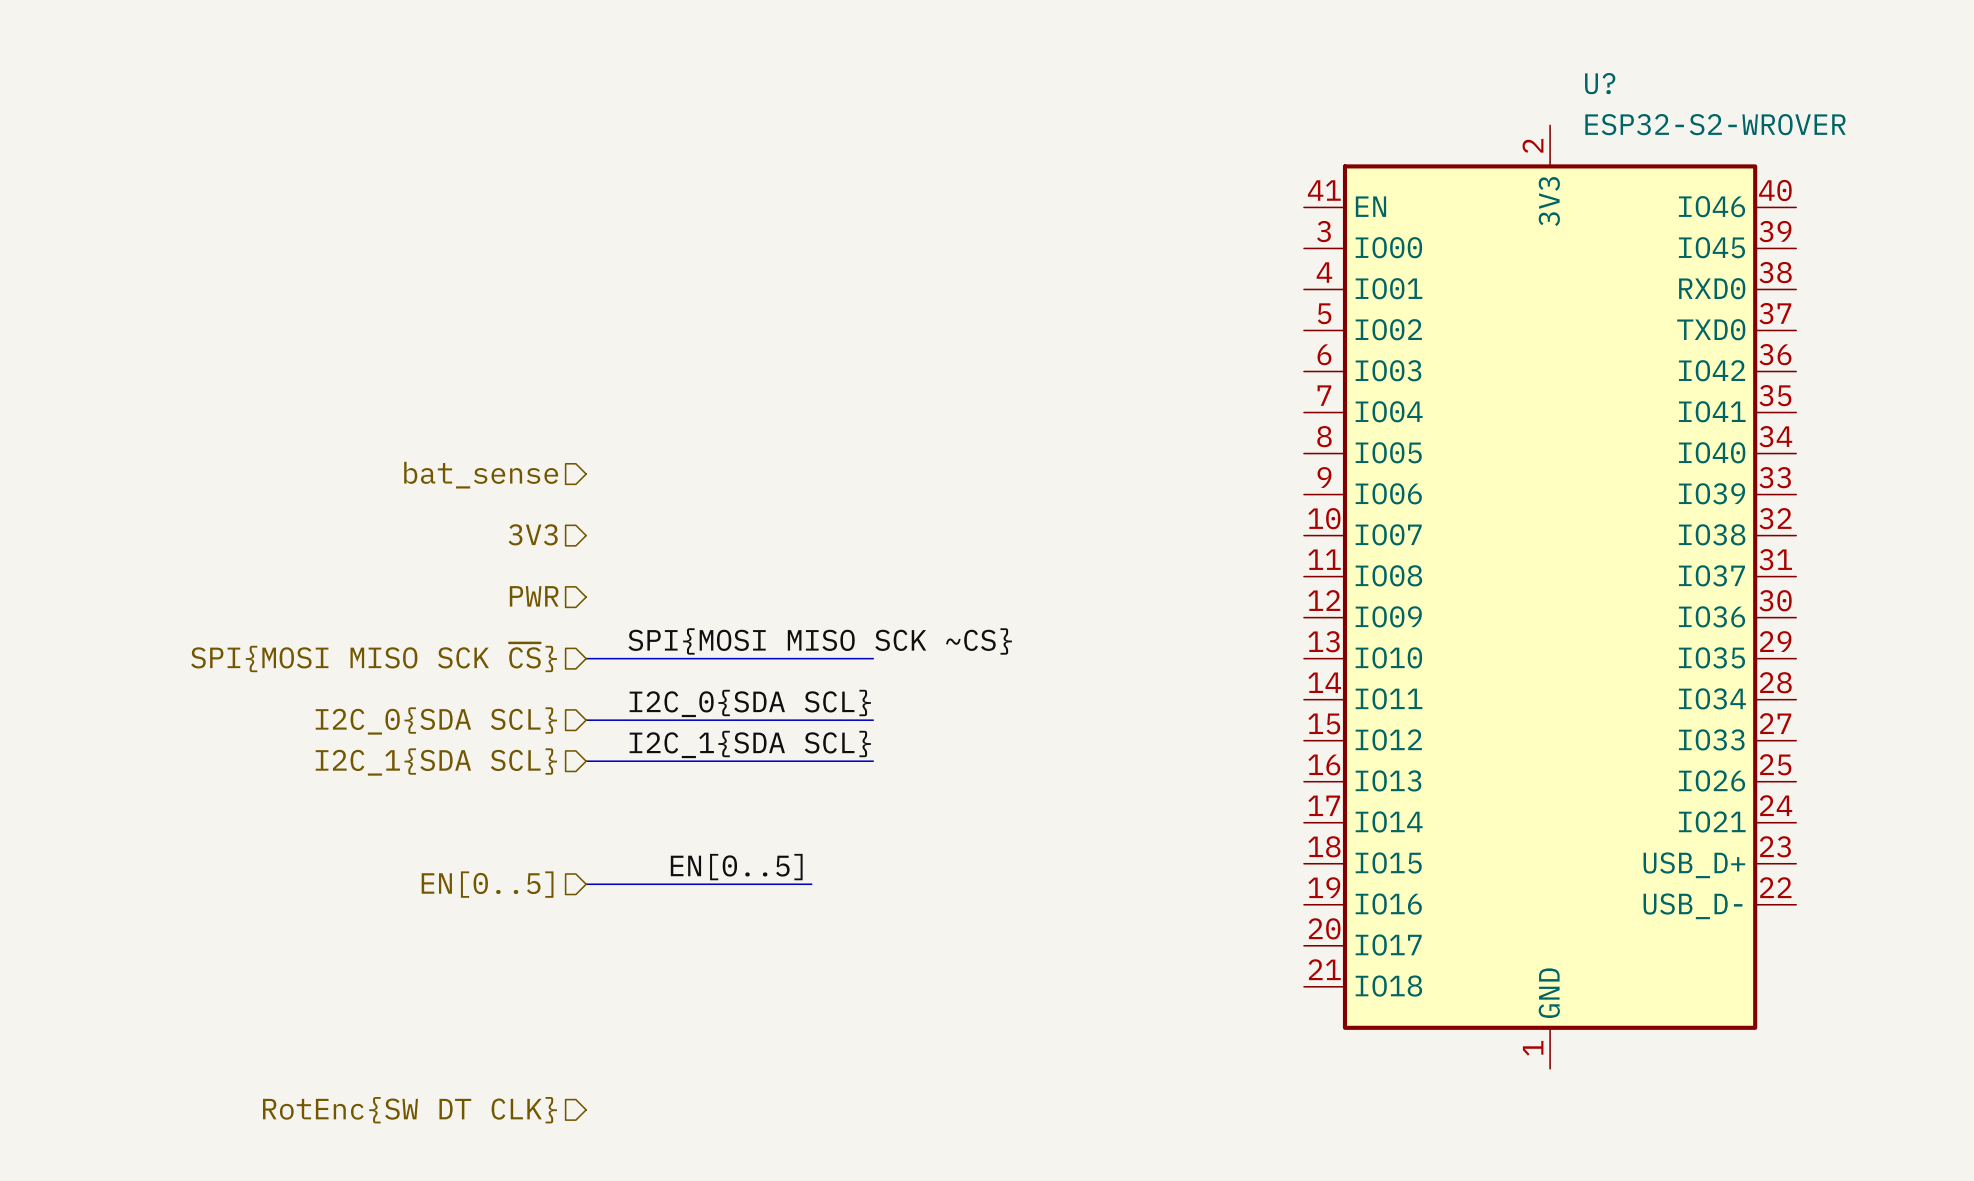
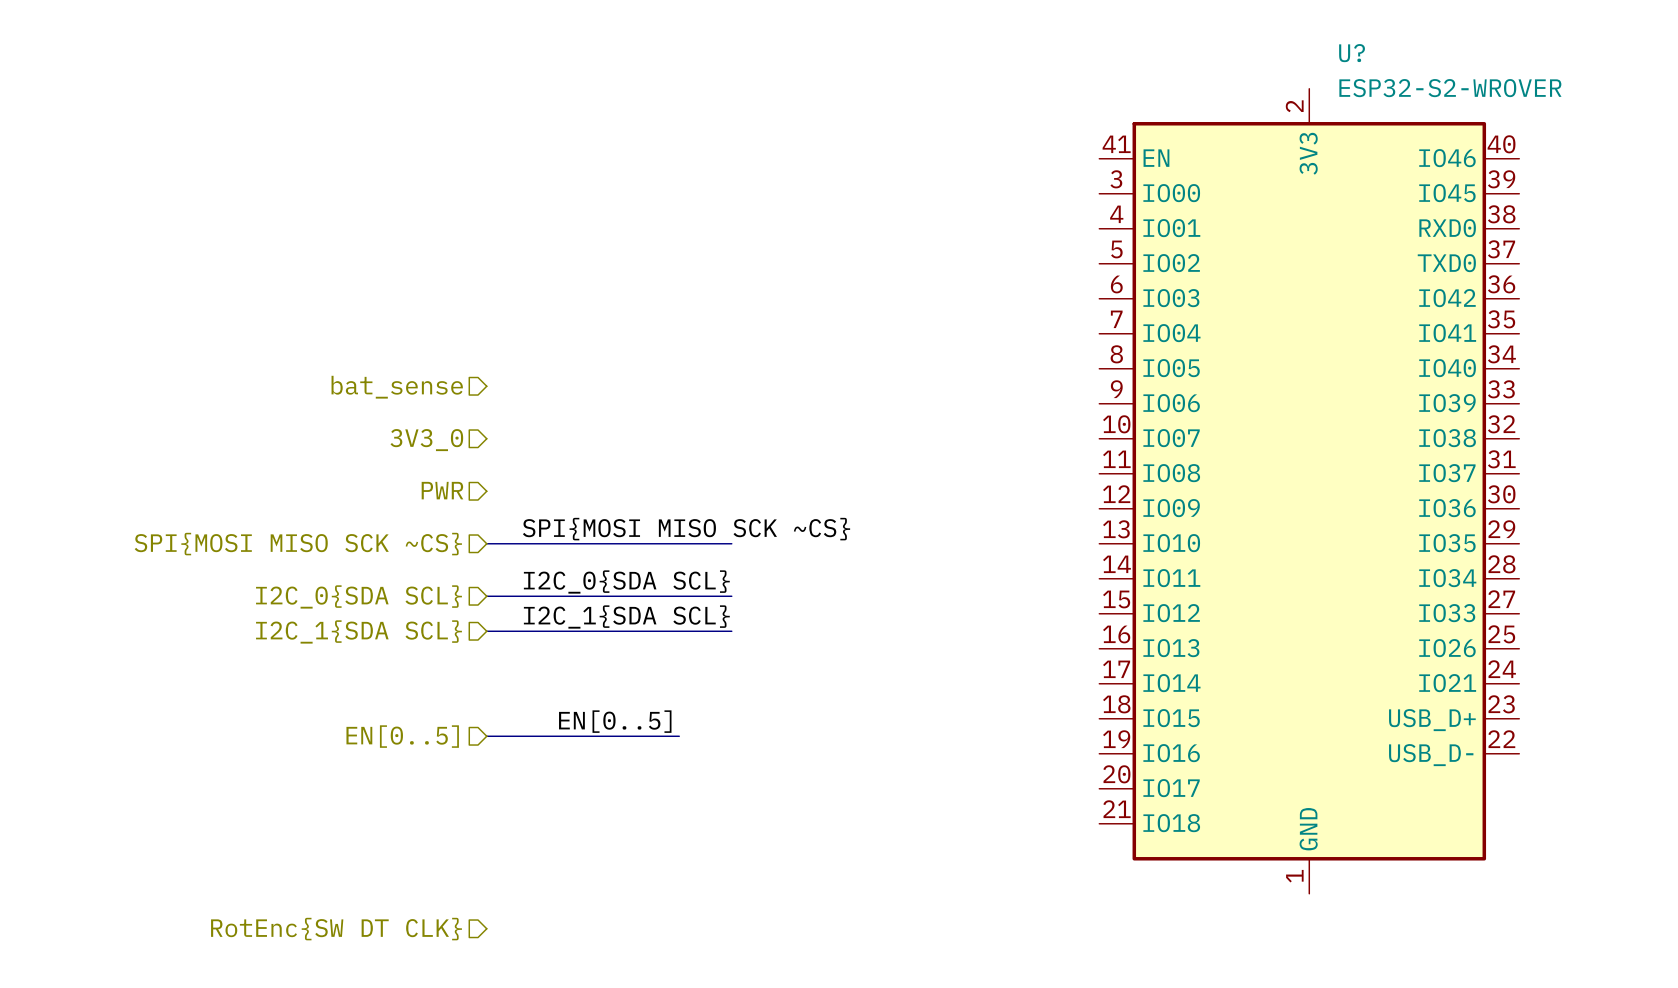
hierarchical label: 3V3 (533, 534) -> 3V3_0 (426, 440)
hierarchical label: SPI{MOSI MISO SCK ~{CS}} (374, 657) -> SPI{MOSI MISO SCK ~CS} (298, 544)

